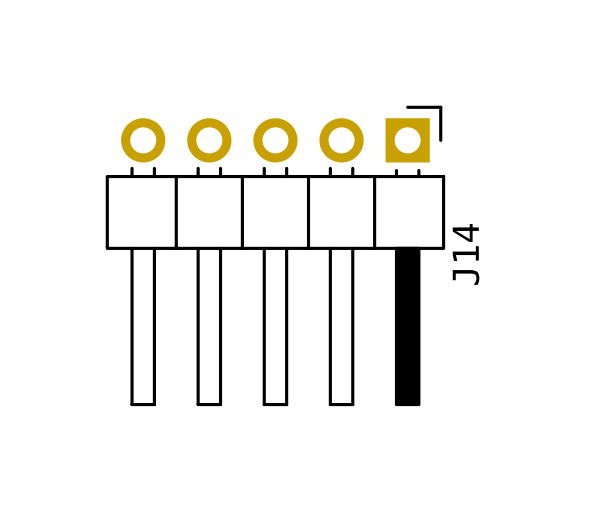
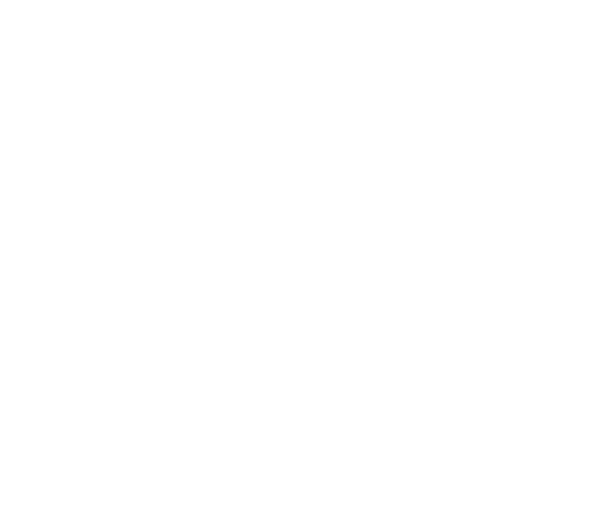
J14: (275, 255) -> none

